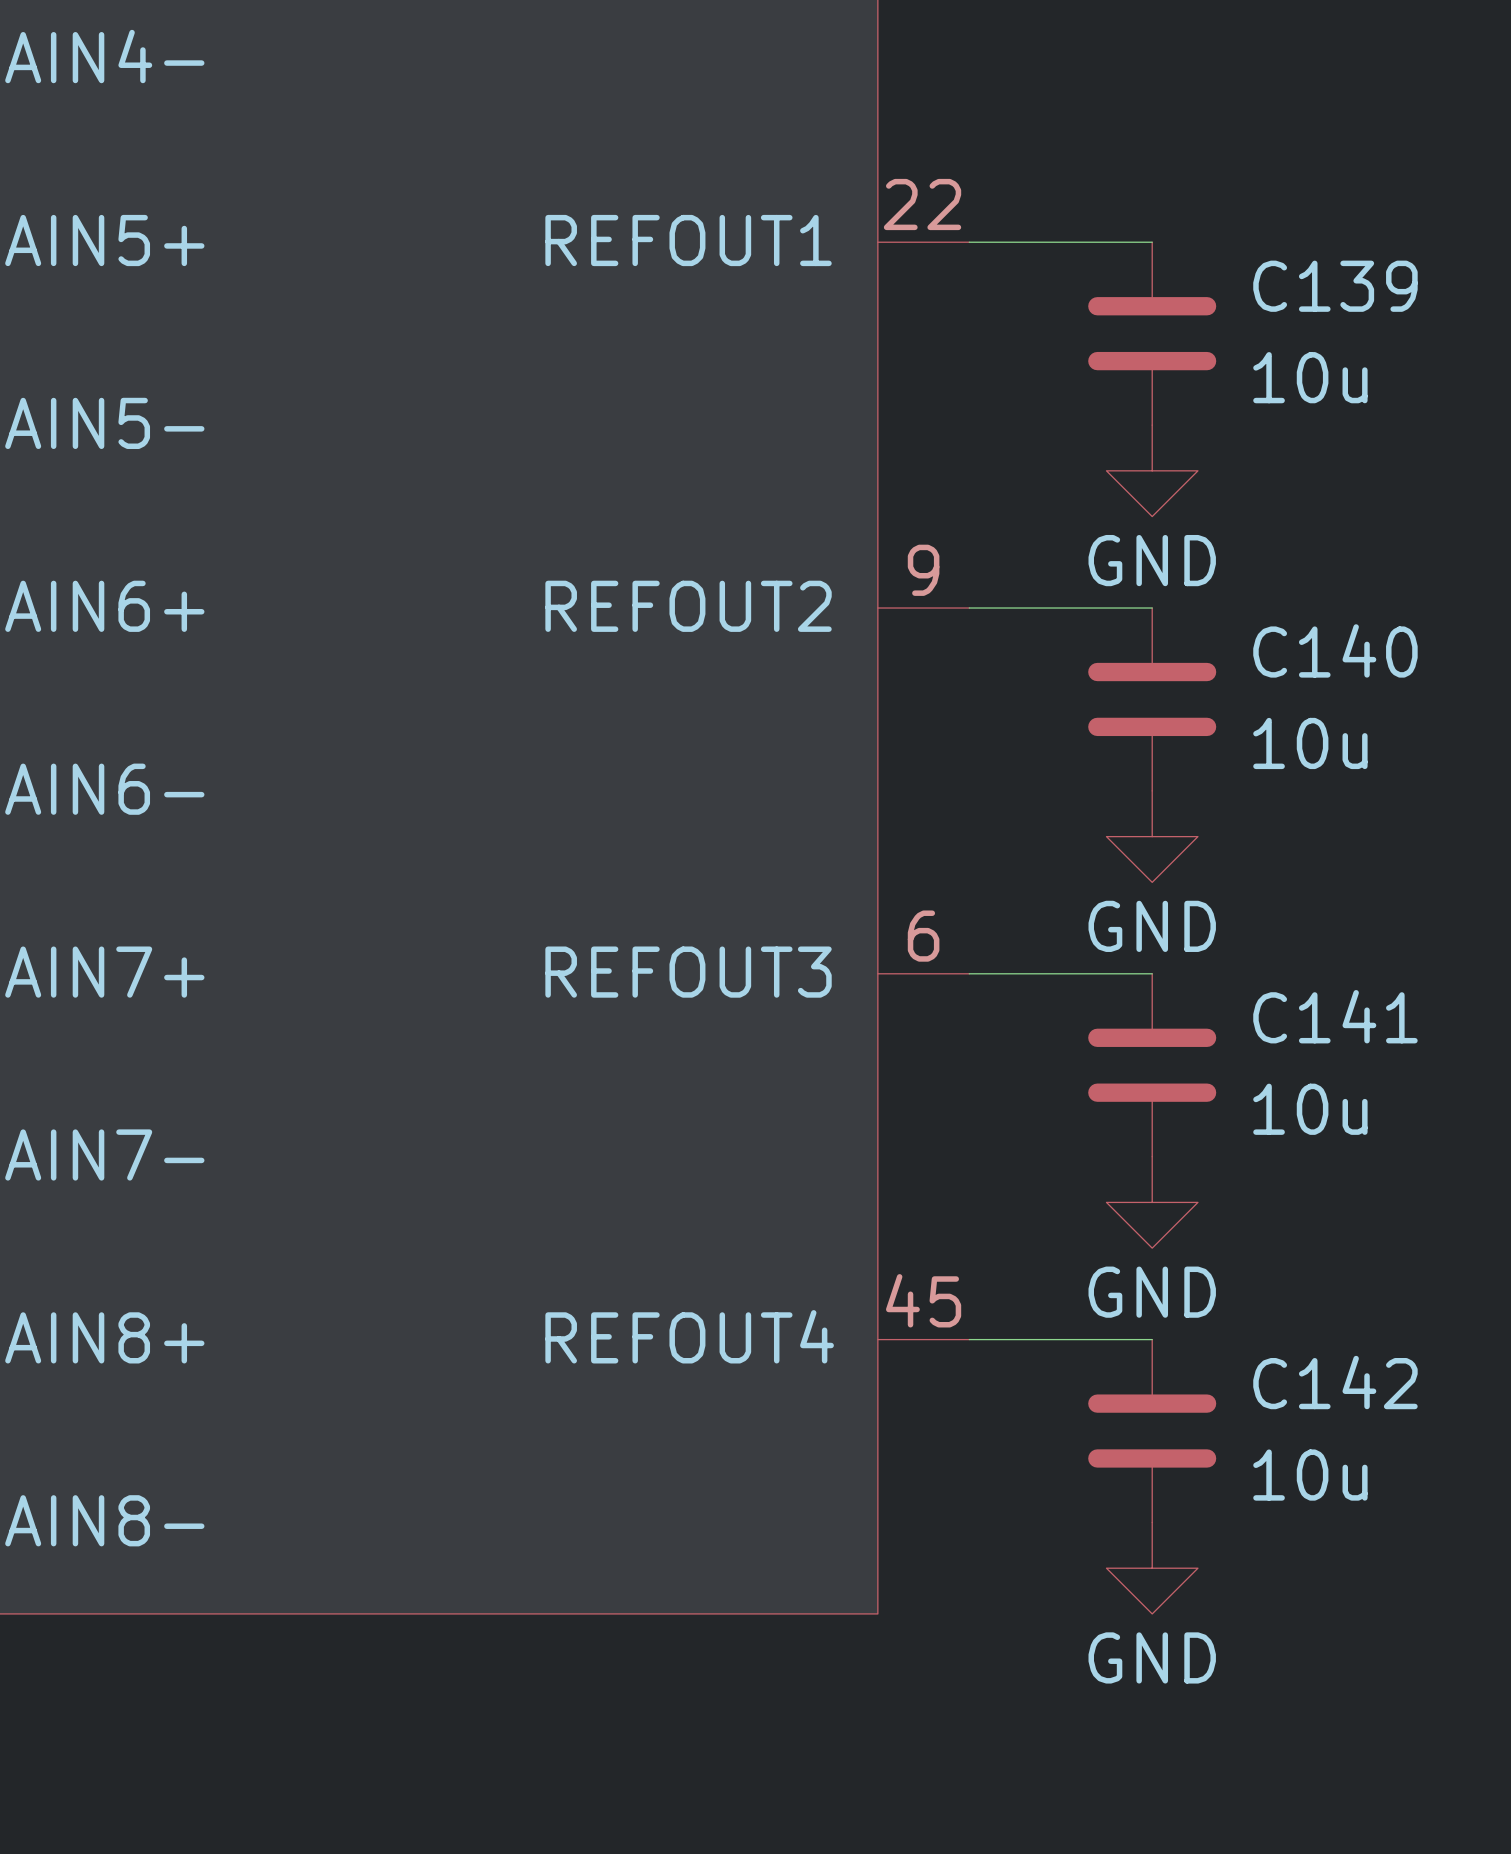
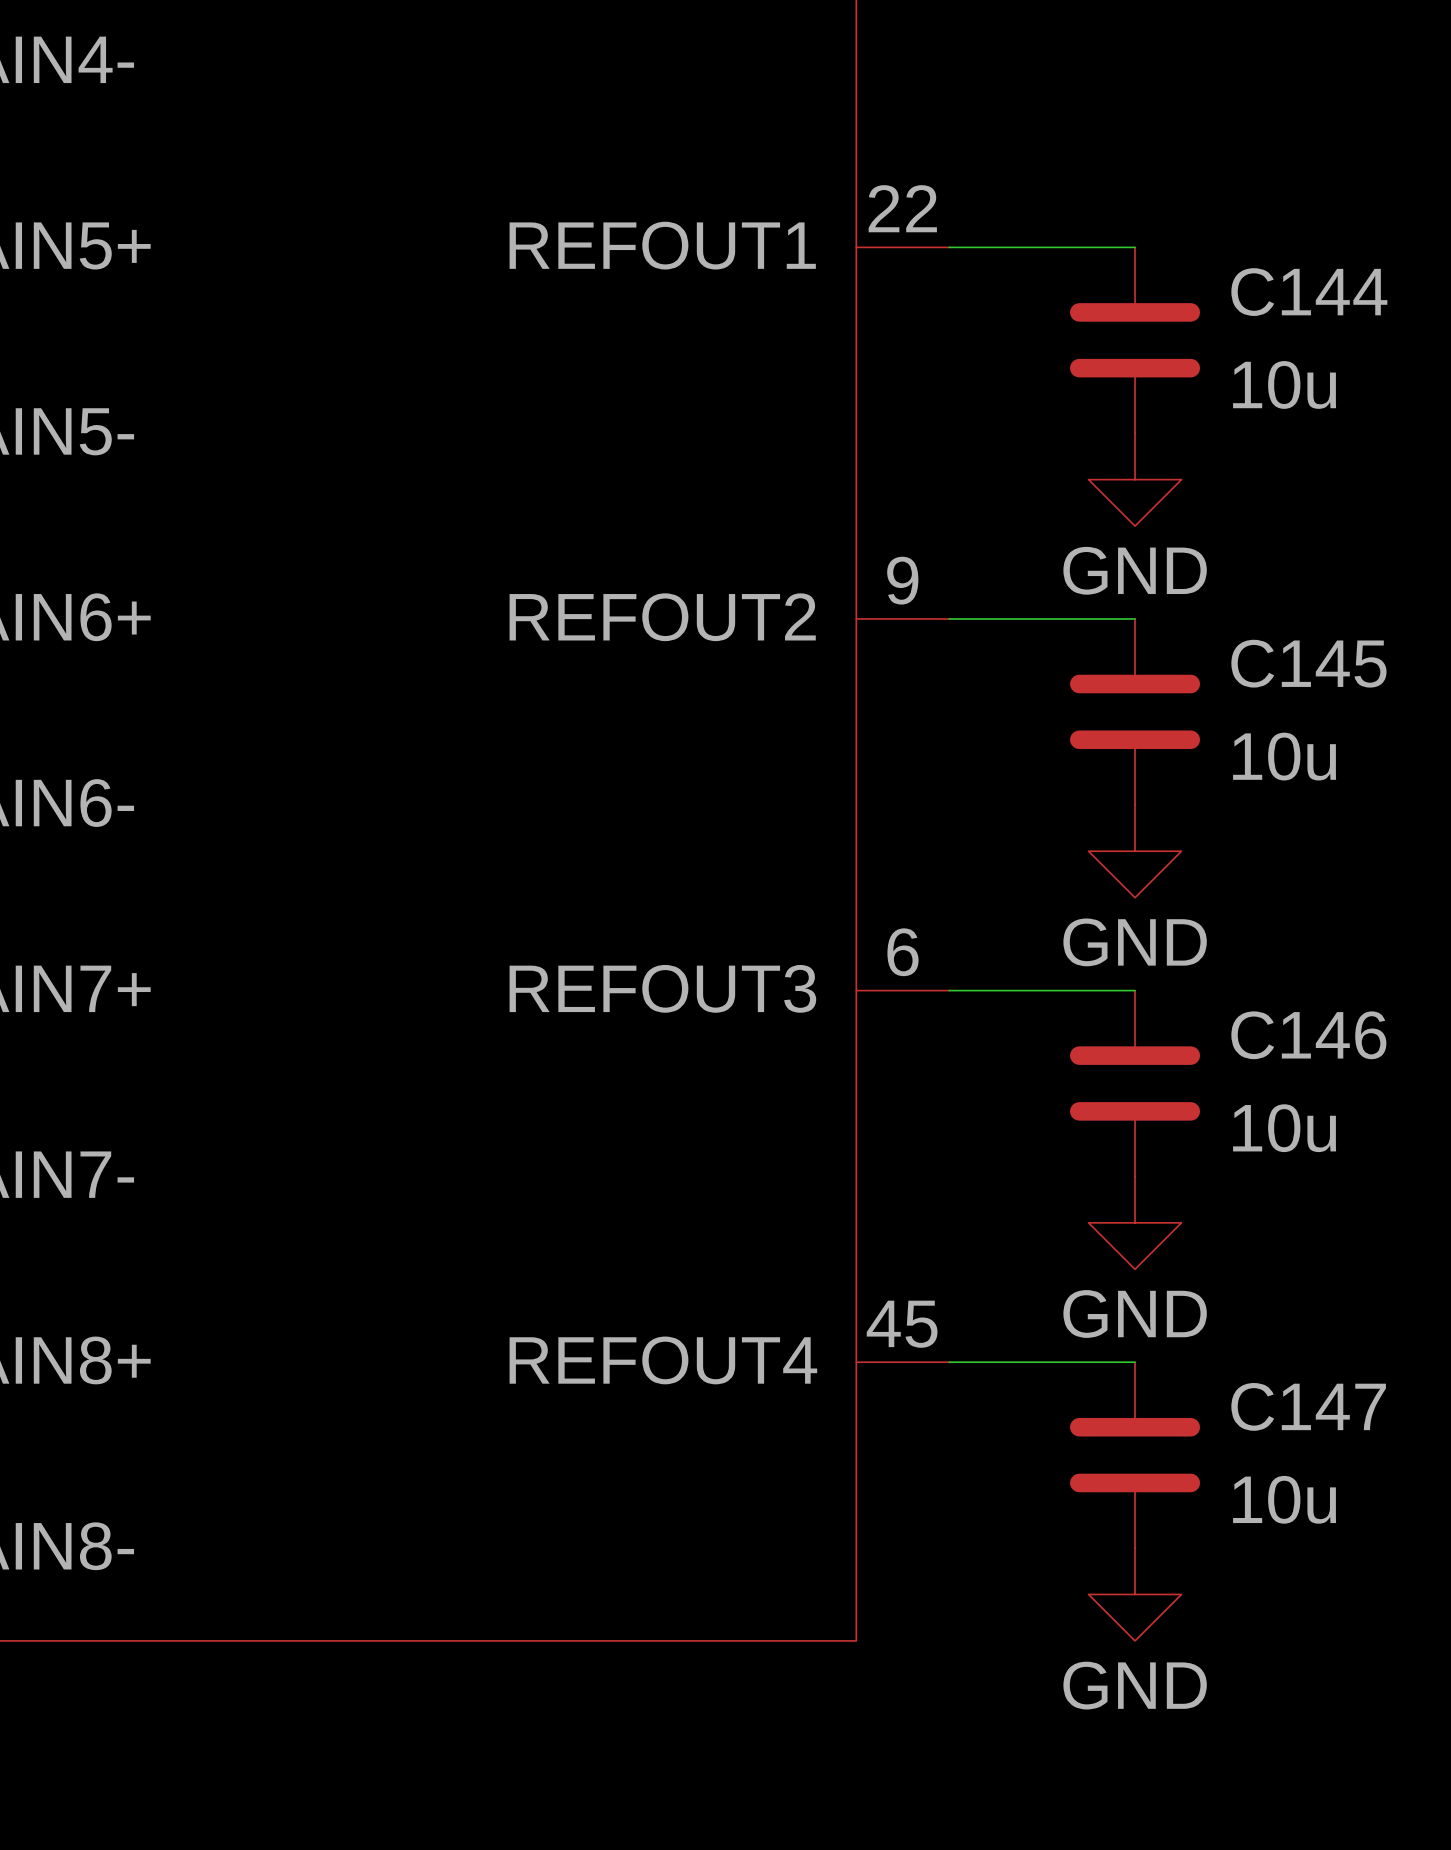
C139 name: C139 (1335, 286) -> C144 (1309, 292)
C140 name: C140 (1335, 650) -> C145 (1308, 663)
C141 name: C141 (1335, 1016) -> C146 (1308, 1035)
C142 name: C142 (1335, 1382) -> C147 (1308, 1406)

